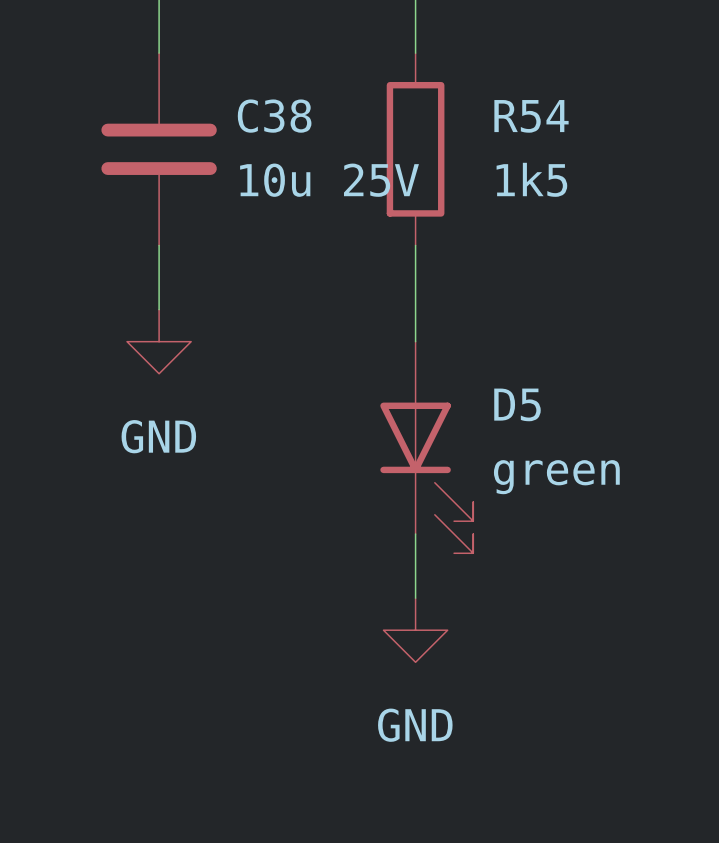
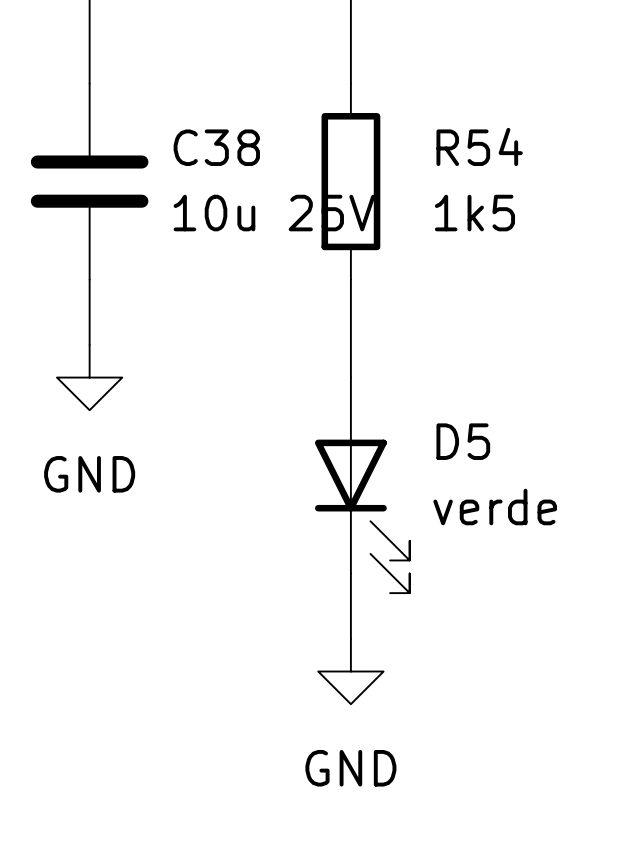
D5 value: green (556, 477) -> verde (495, 506)

